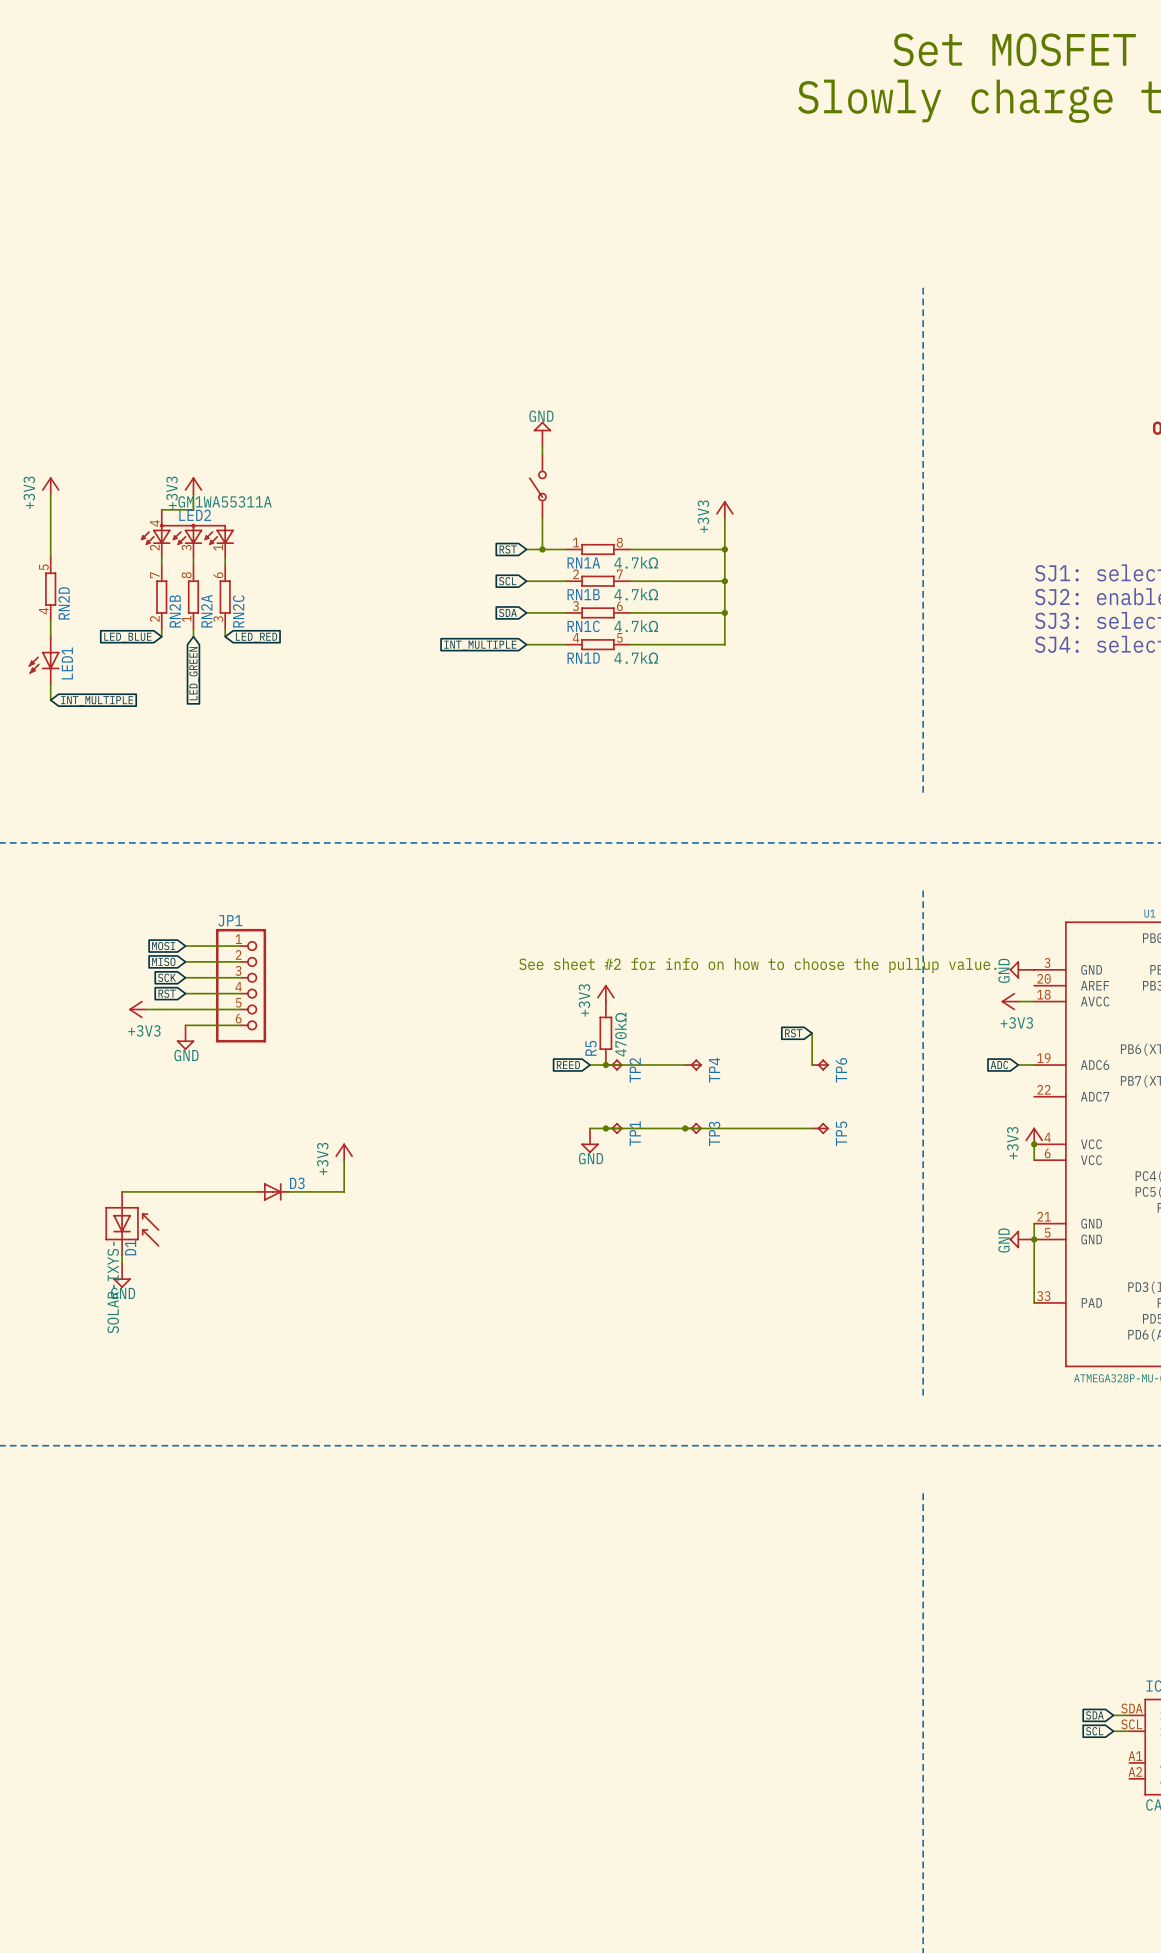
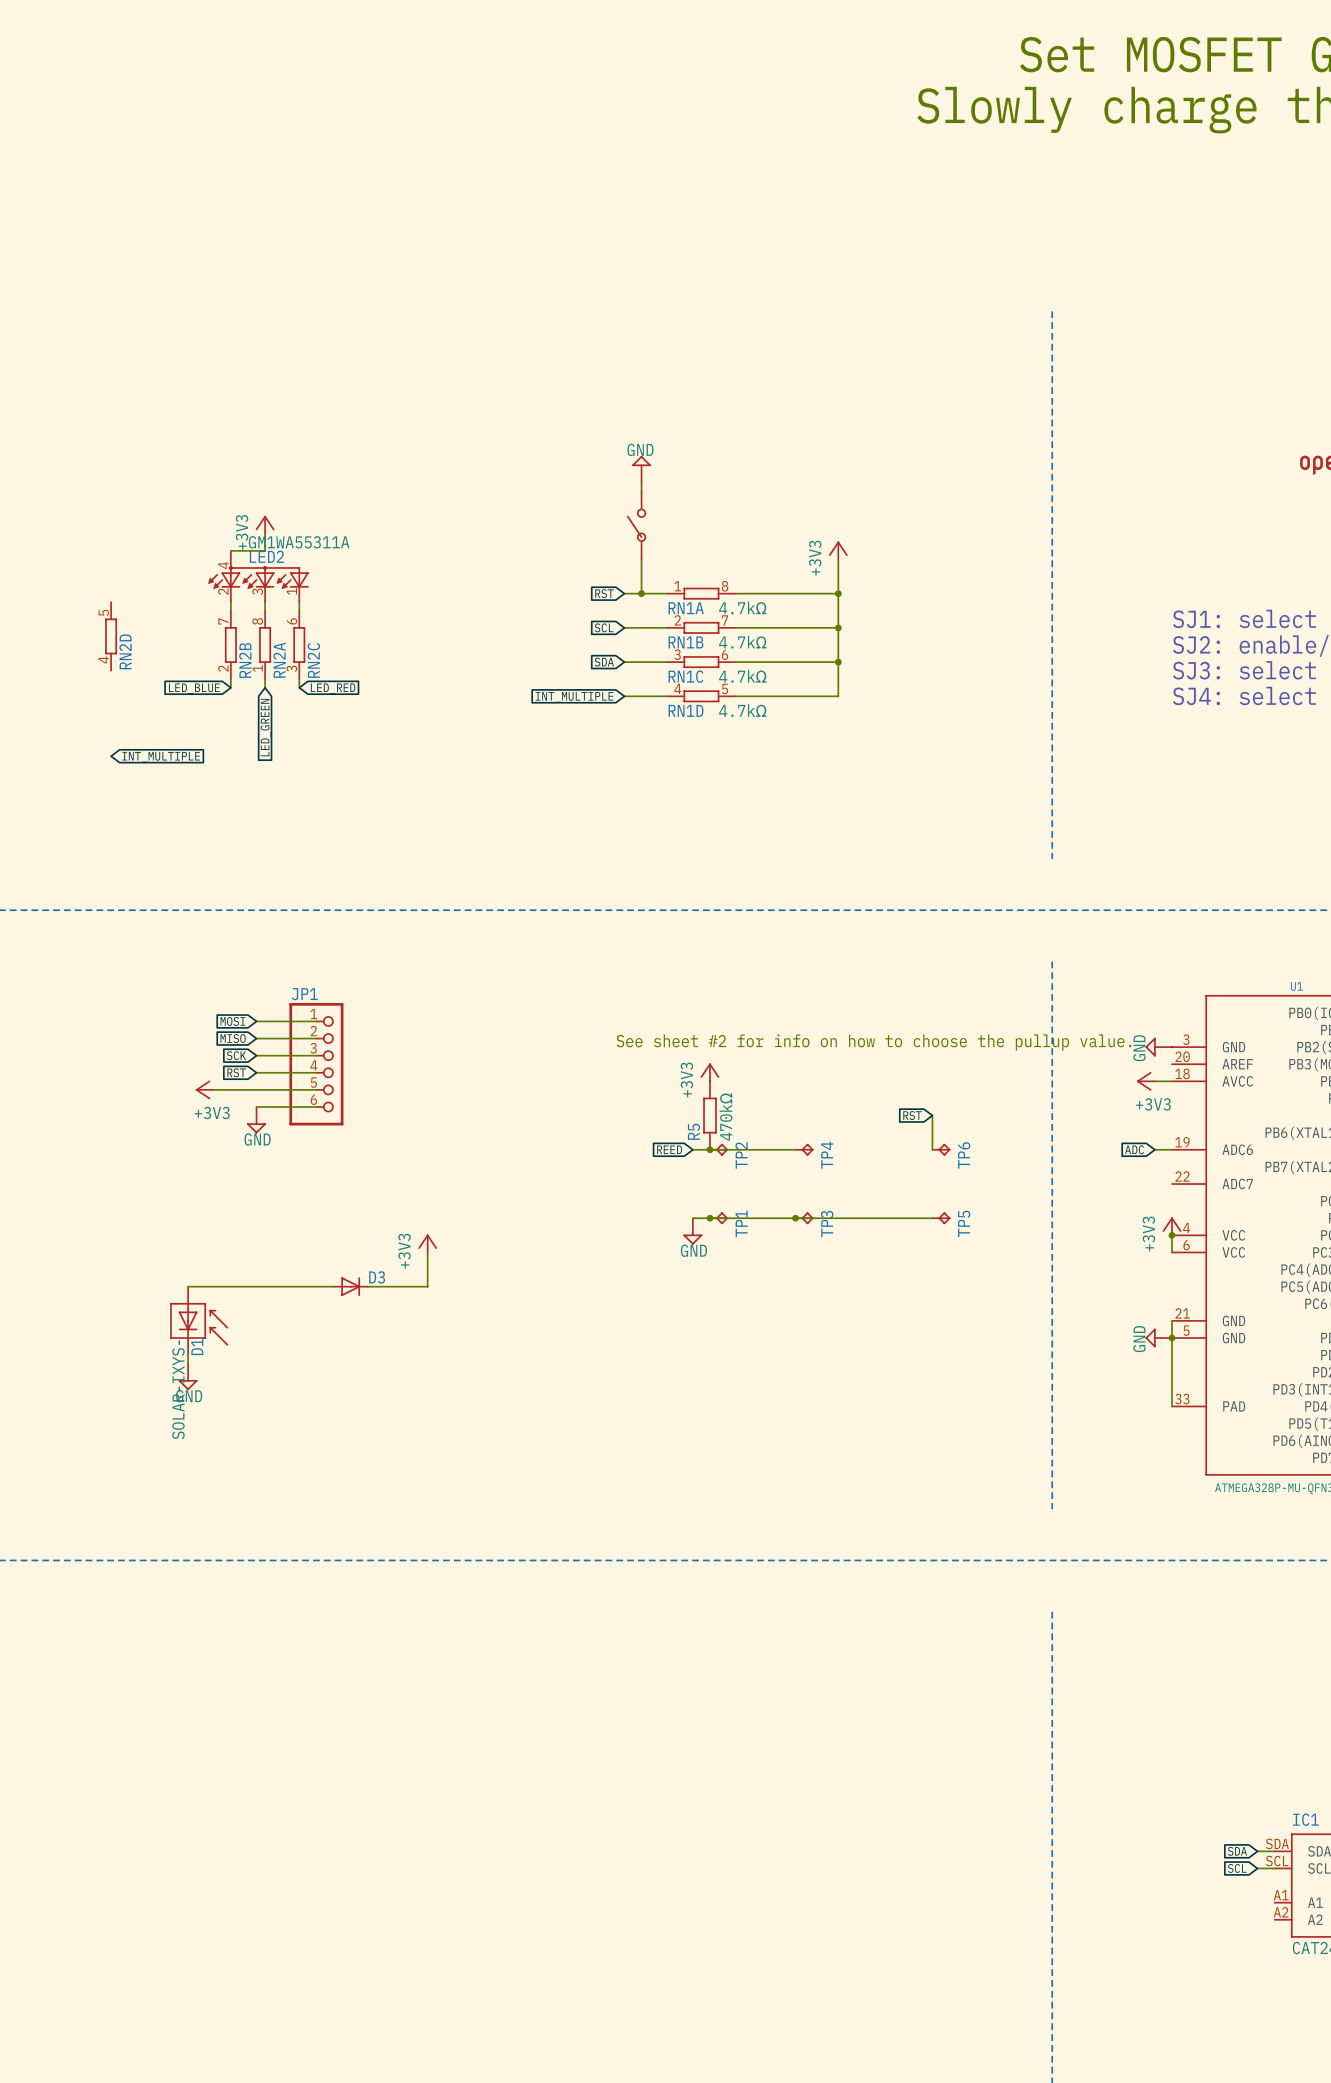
power symbol: +3V3 (50, 485) -> none
wire: (50, 493) (50, 557) -> none
wire: (50, 620) (50, 636) -> none
LED1: (44, 660) -> none
wire: (50, 684) (50, 700) -> none

